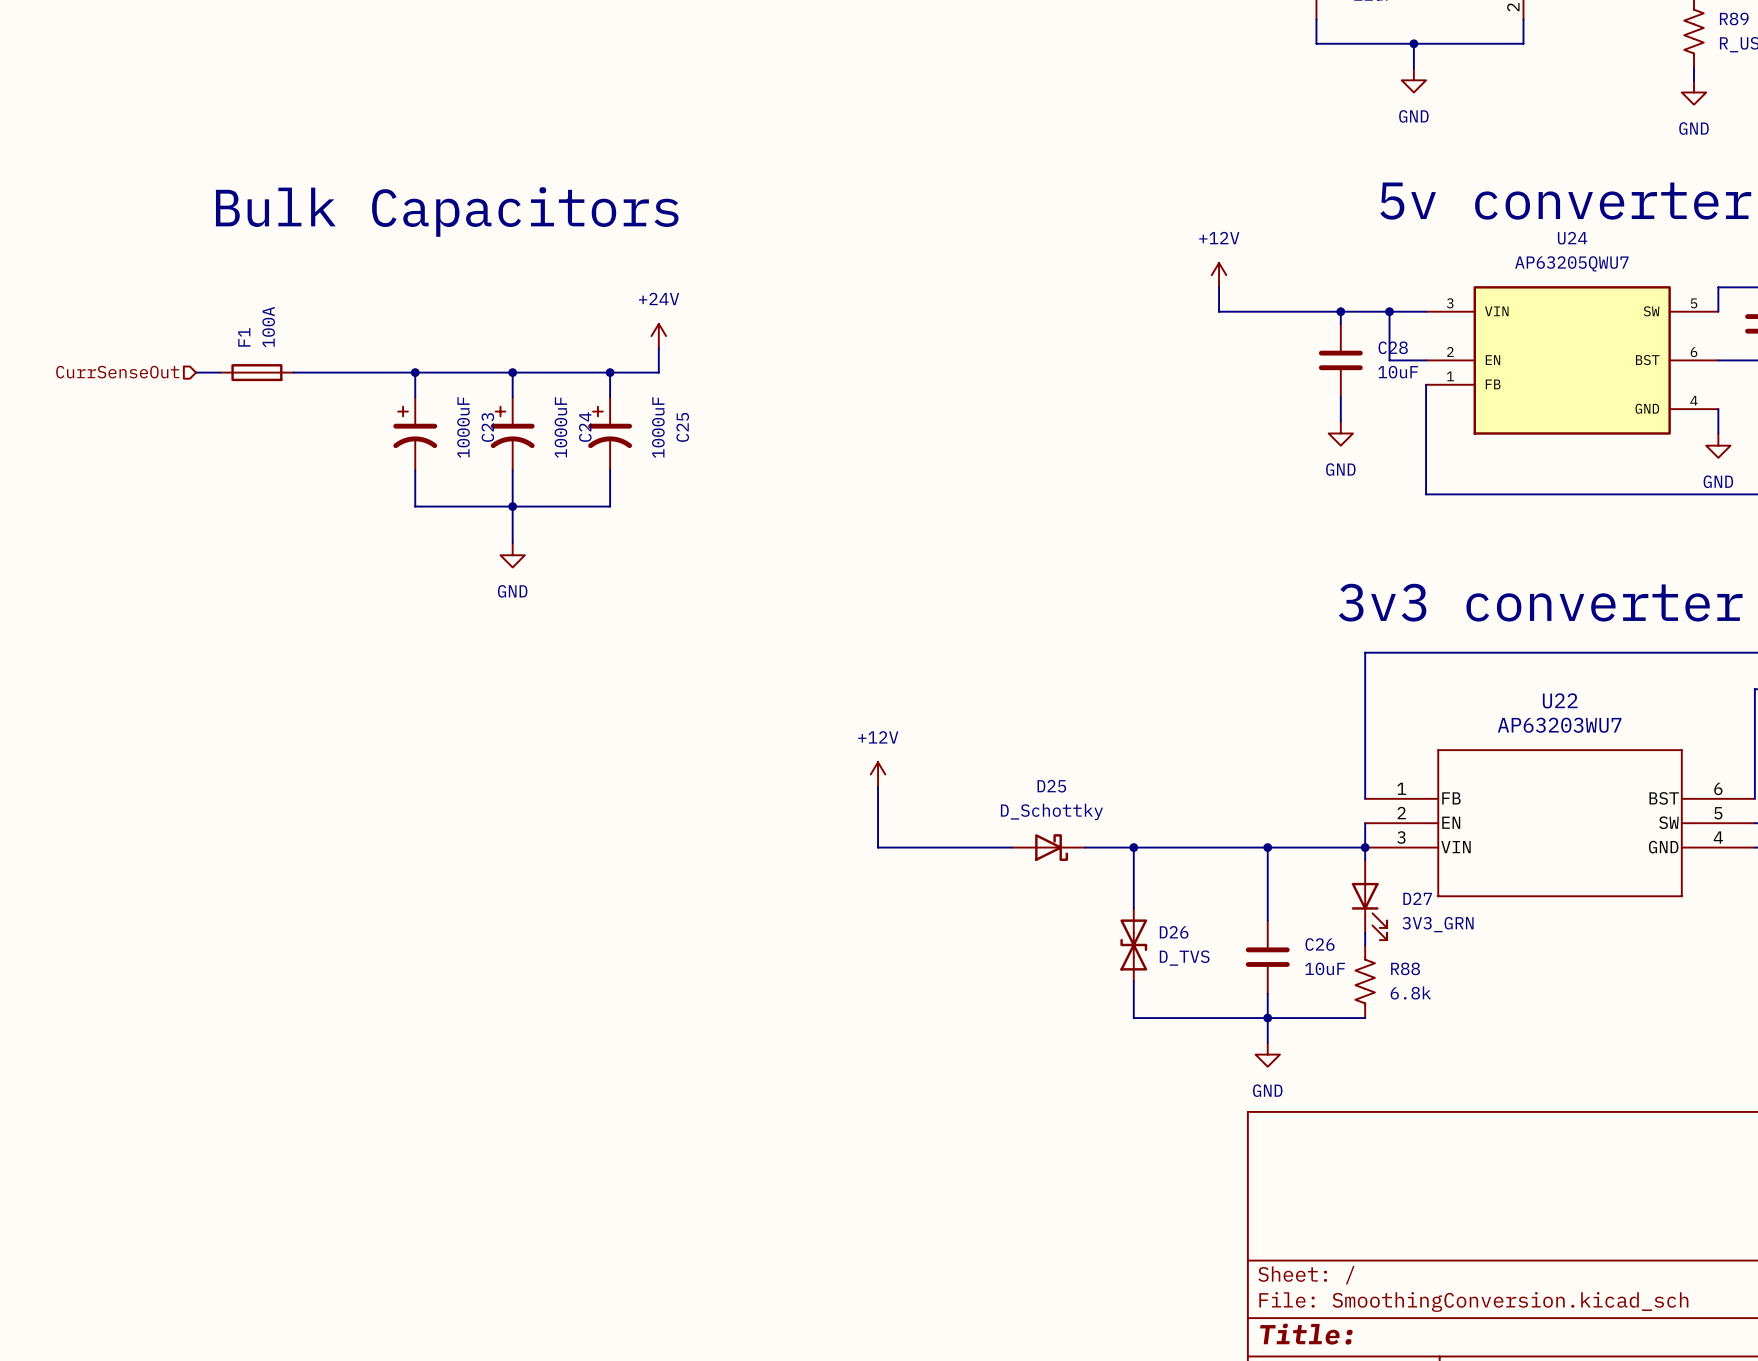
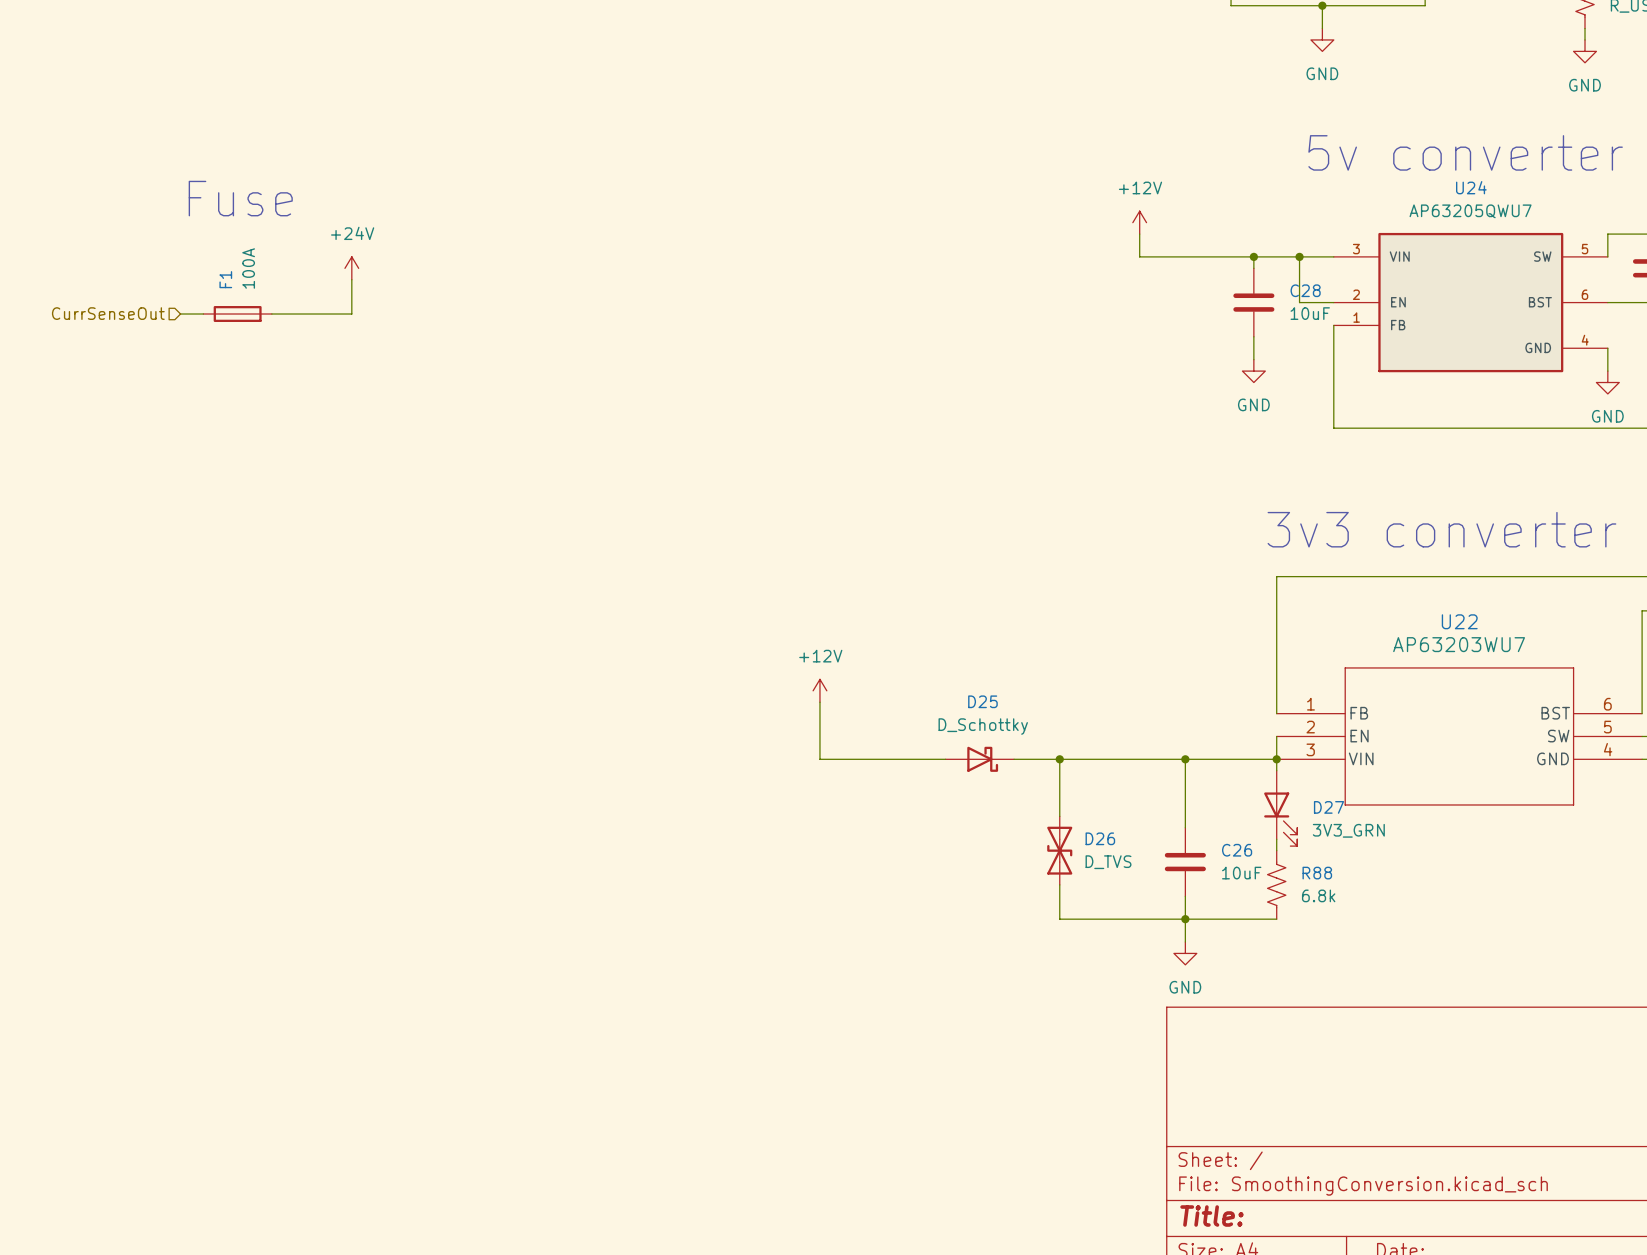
text: Bulk Capacitors (447, 212) -> none
text: none -> Fuse (240, 198)
power symbol: none -> +24V (351, 268)
power symbol: +24V (658, 336) -> none
wire: (658, 348) (658, 372) (378, 372) -> (351, 279) (351, 314)
wire: (415, 372) (415, 396) -> none
junction: (415, 372) -> none
wire: (512, 372) (512, 396) -> none
junction: (512, 372) -> none
wire: (610, 372) (610, 396) -> none
junction: (610, 372) -> none
C23: 1000uF (415, 433) -> none
C24: 1000uF (512, 433) -> none
C25: 1000uF (610, 433) -> none
wire: (415, 470) (415, 506) (610, 506) (610, 470) -> none
wire: (512, 470) (512, 543) -> none
junction: (512, 506) -> none
power symbol: GND (512, 555) -> none

